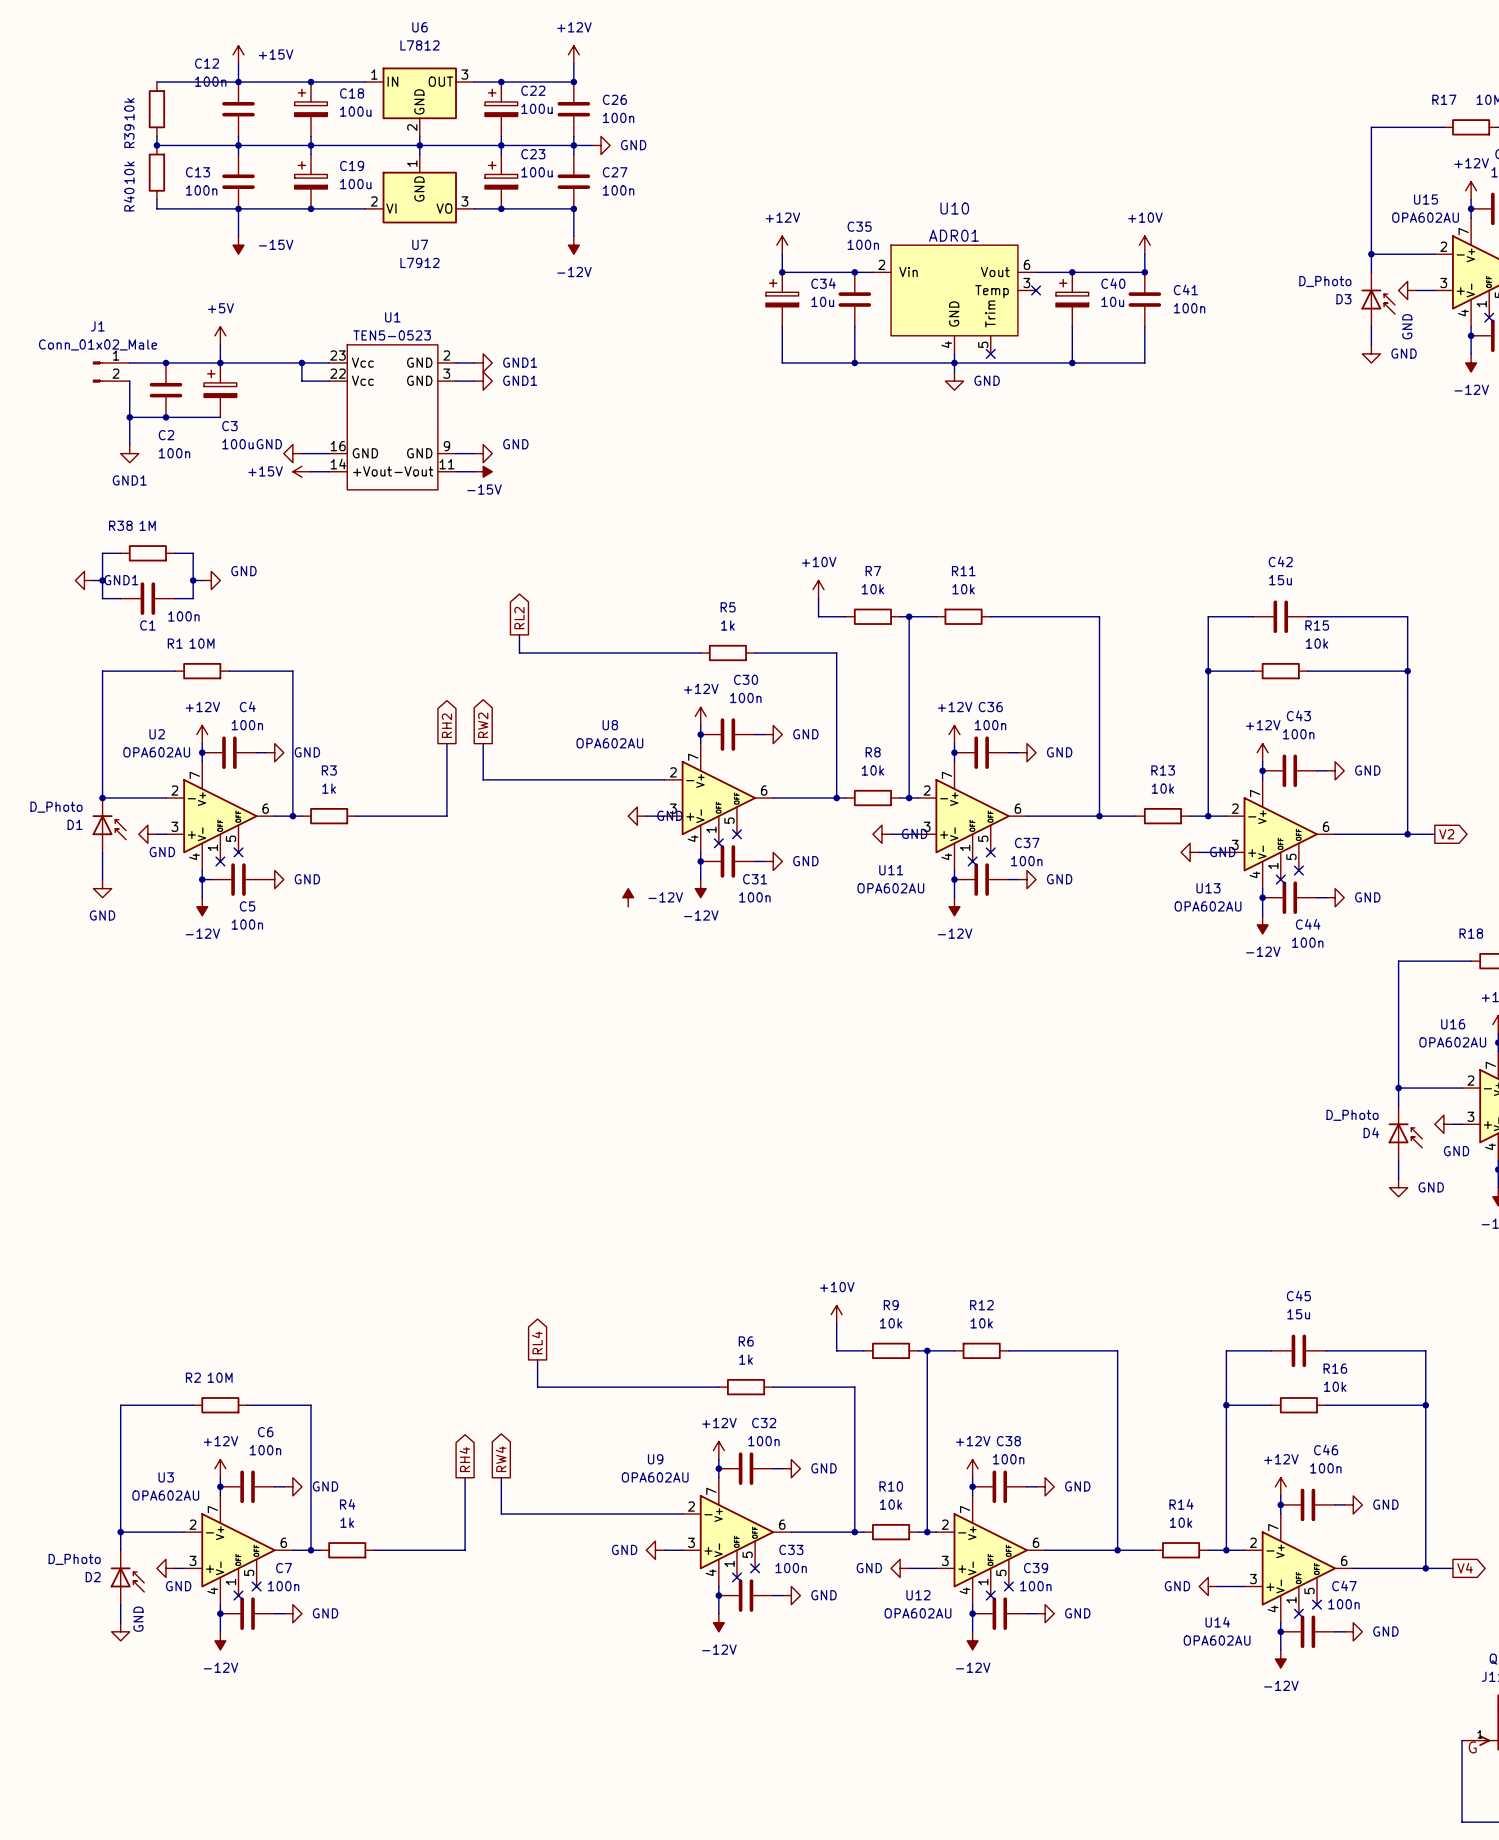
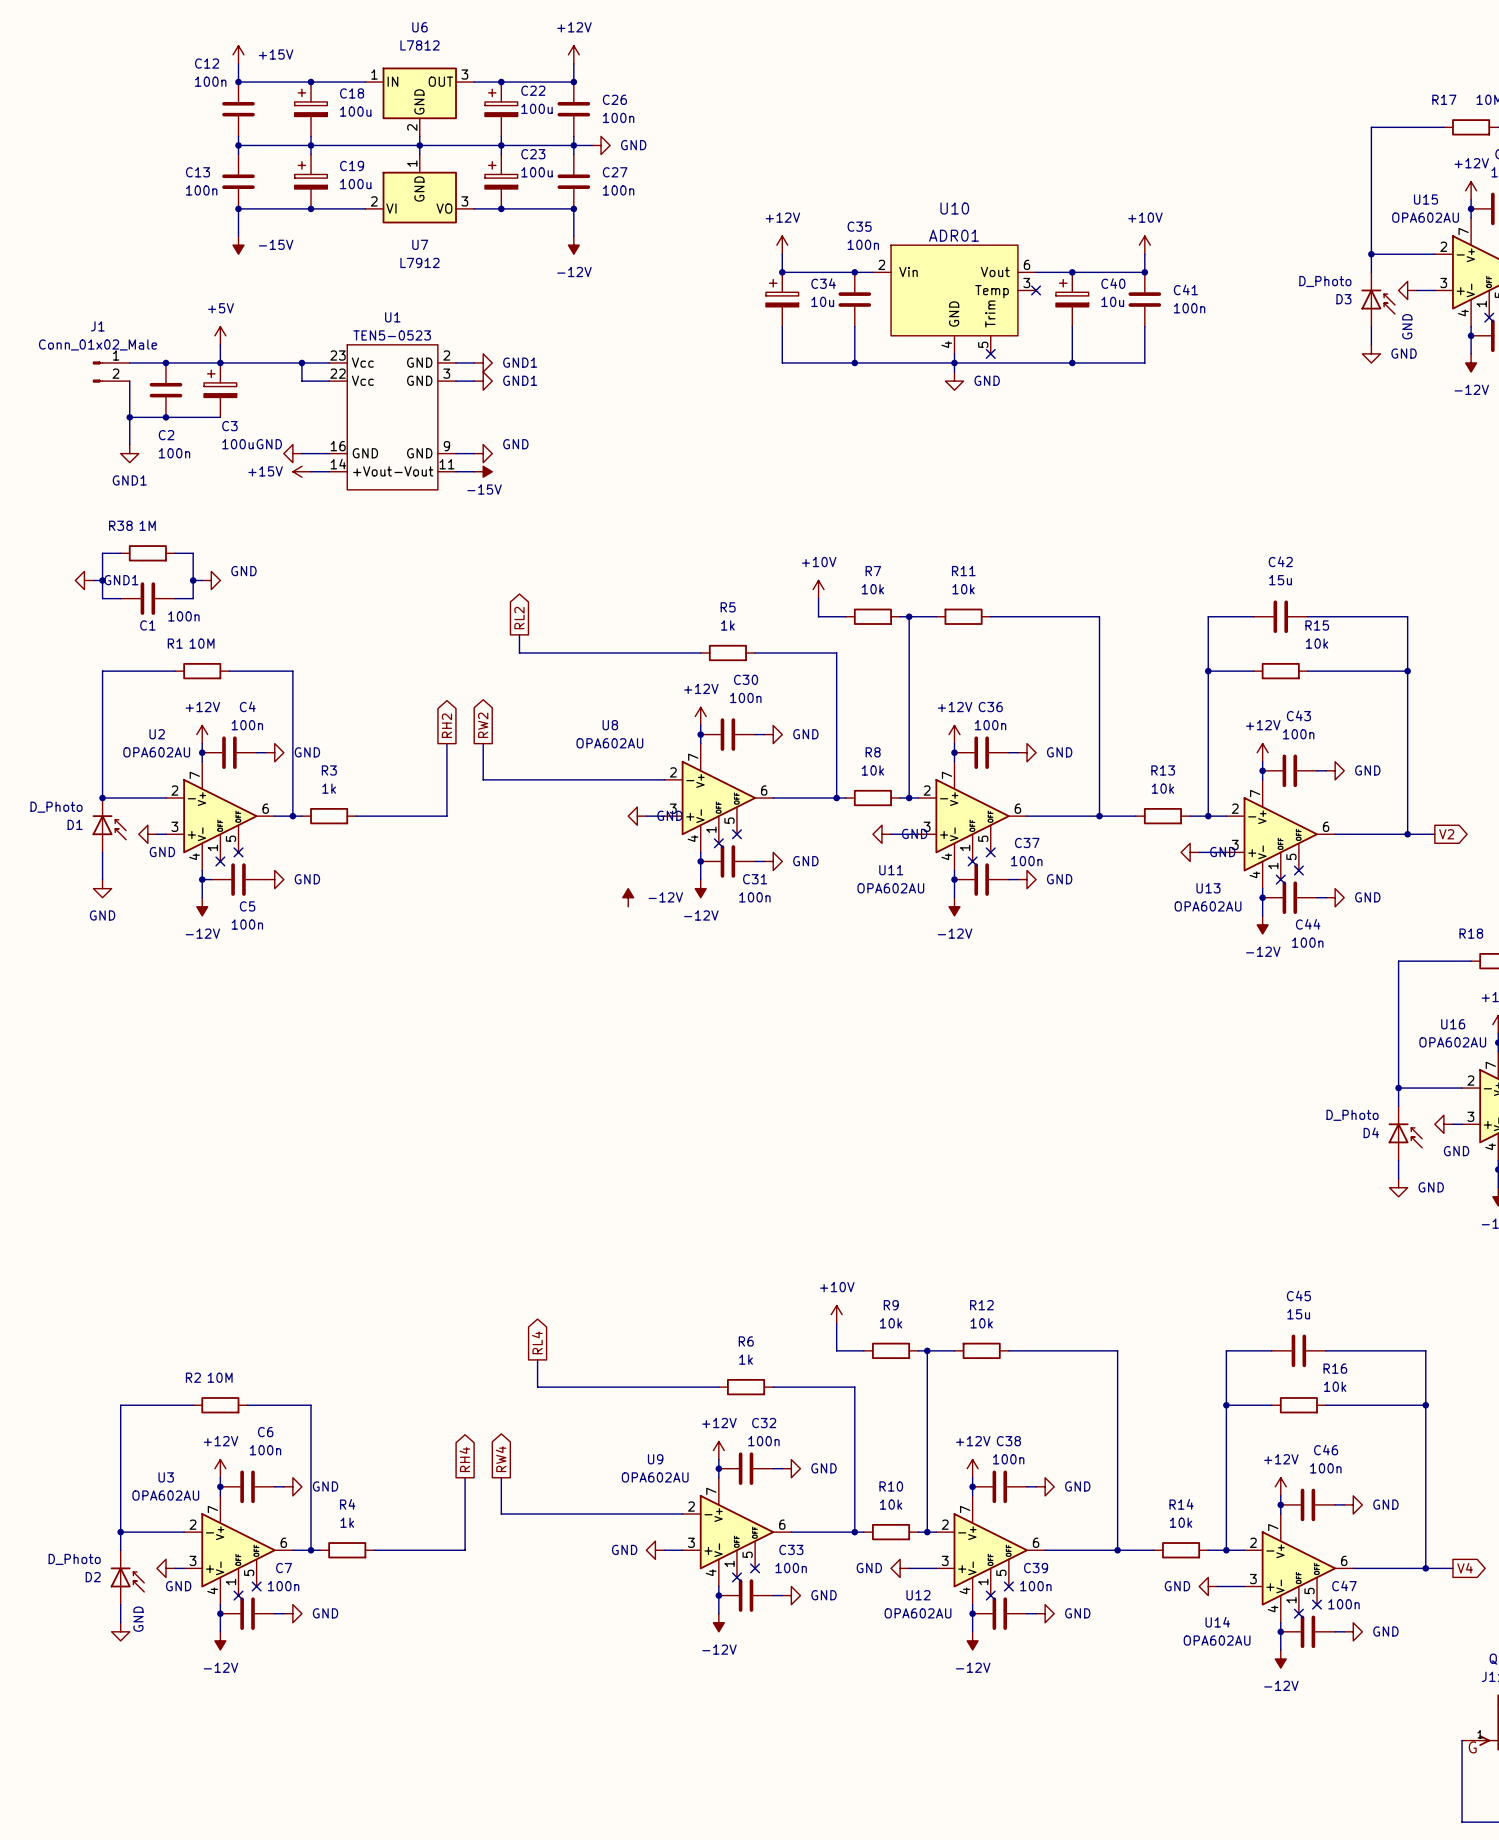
wire: (156, 82) (238, 82) -> none
R39: 10k (156, 109) -> none
wire: (156, 136) (156, 145) (238, 145) -> none
junction: (156, 145) -> none
R40: 10k (156, 172) -> none
wire: (156, 199) (156, 208) (238, 208) -> none

